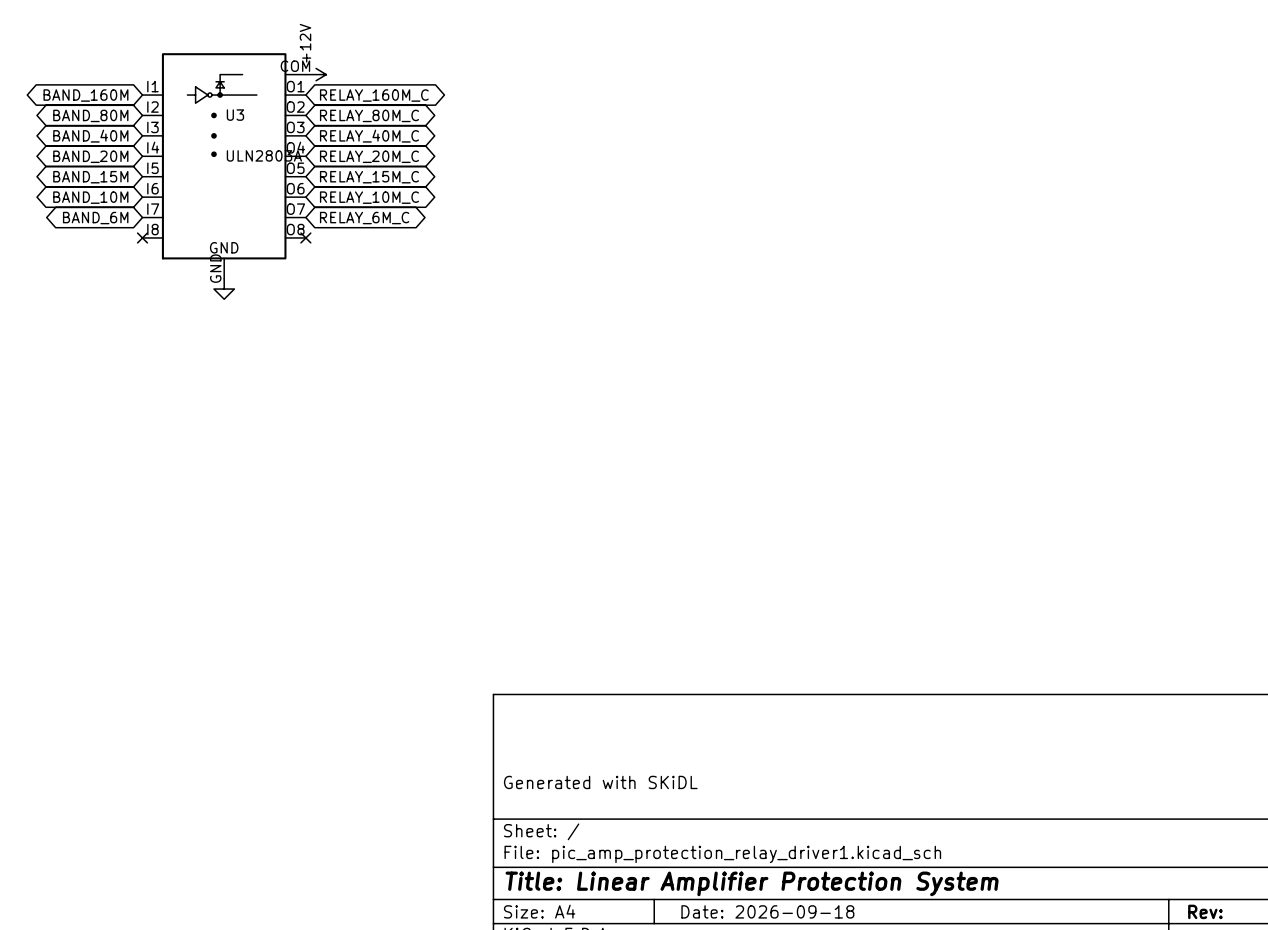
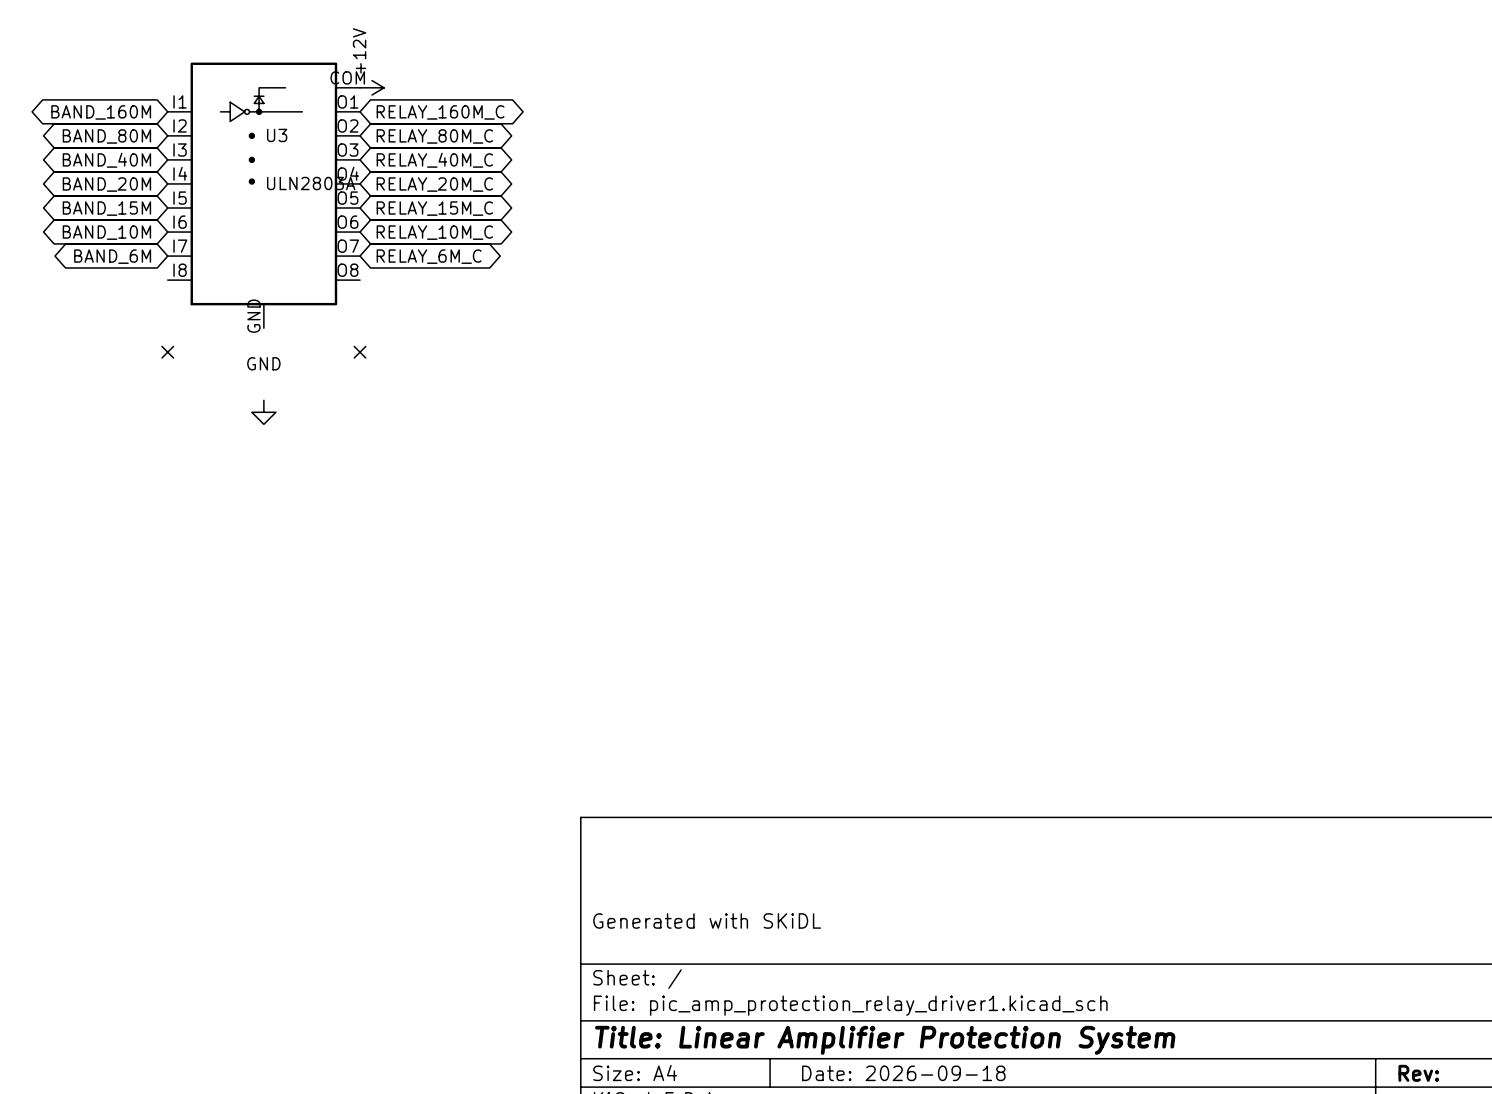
no-connect mark: (142, 237) -> none
no-connect mark: (305, 237) -> none
power symbol position: GND (224, 289) -> GND (263, 412)
no-connect mark: none -> (167, 352)
no-connect mark: none -> (360, 352)

